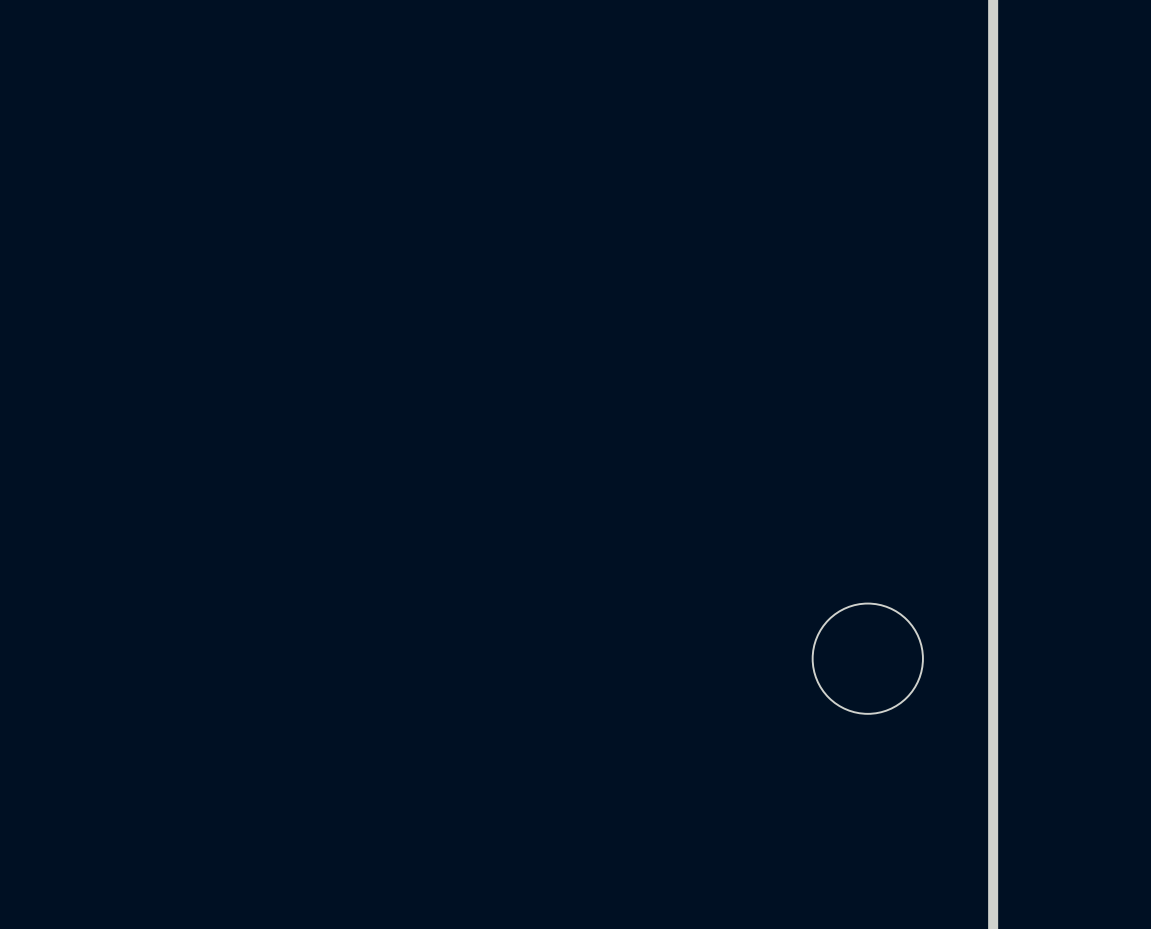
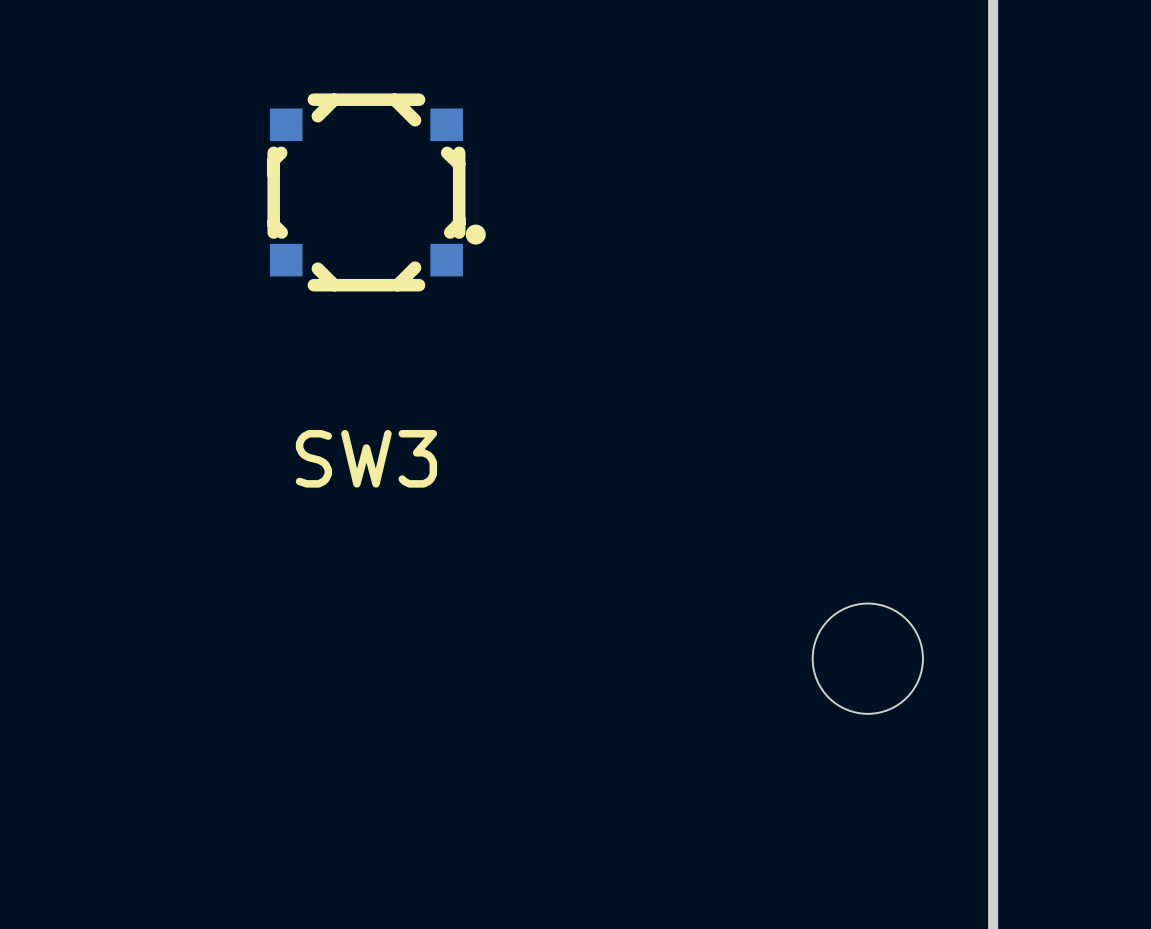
SW3: none -> (376, 192)

